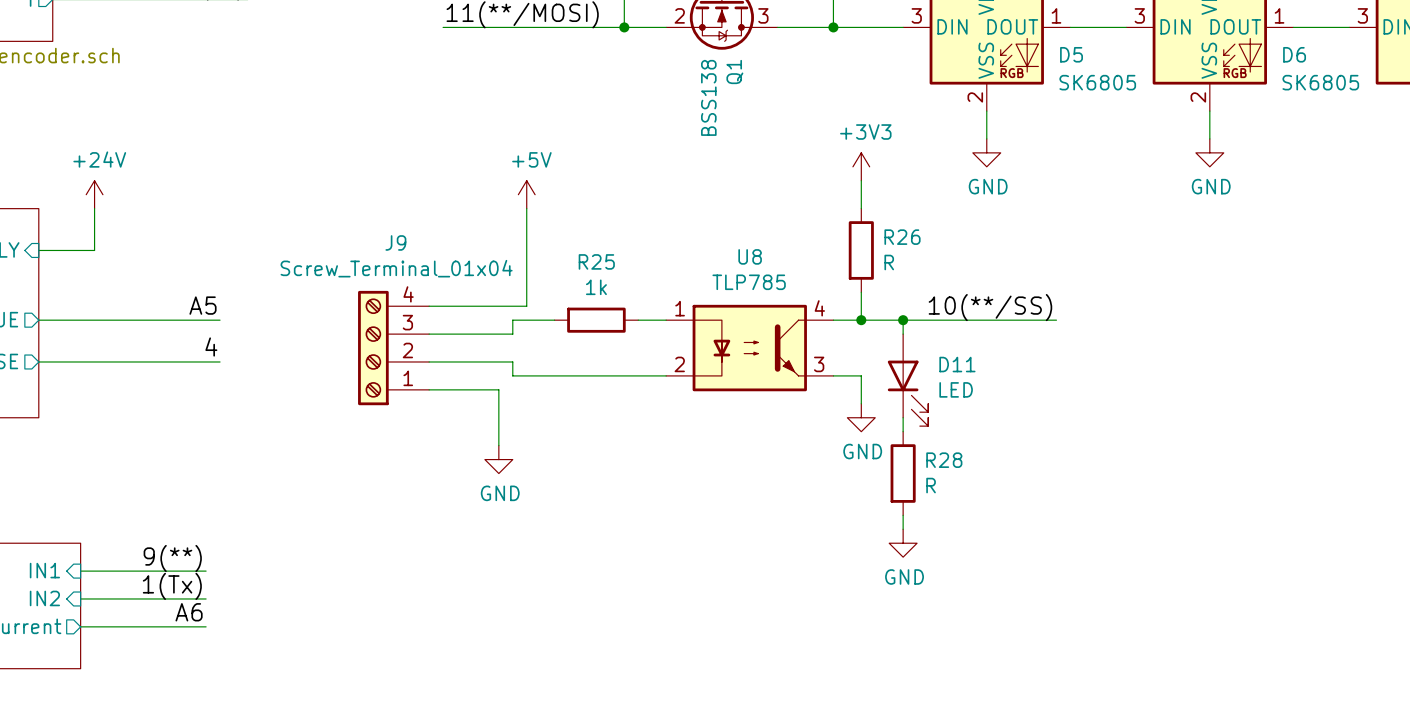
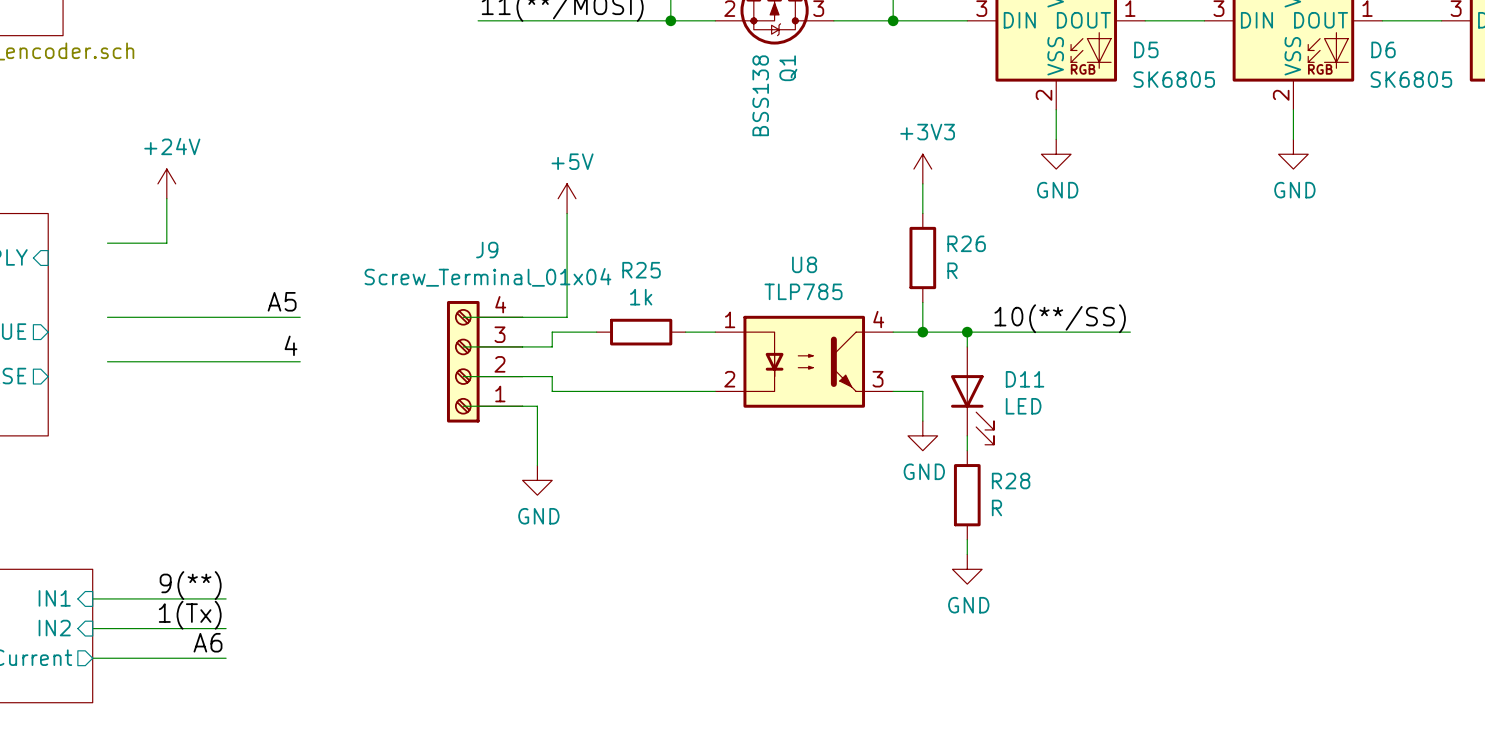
power symbol position: +24V (94, 194) -> +24V (166, 183)
wire: (94, 208) (94, 250) (38, 250) -> (166, 198) (166, 243) (107, 243)
label position: A5 (203, 305) -> A5 (282, 301)
wire: (38, 320) (220, 320) -> (107, 317) (300, 317)
label position: 4 (211, 347) -> 4 (291, 345)
J9 position: (393, 348) -> (484, 361)
wire: (38, 361) (220, 361) -> (107, 361) (300, 361)

